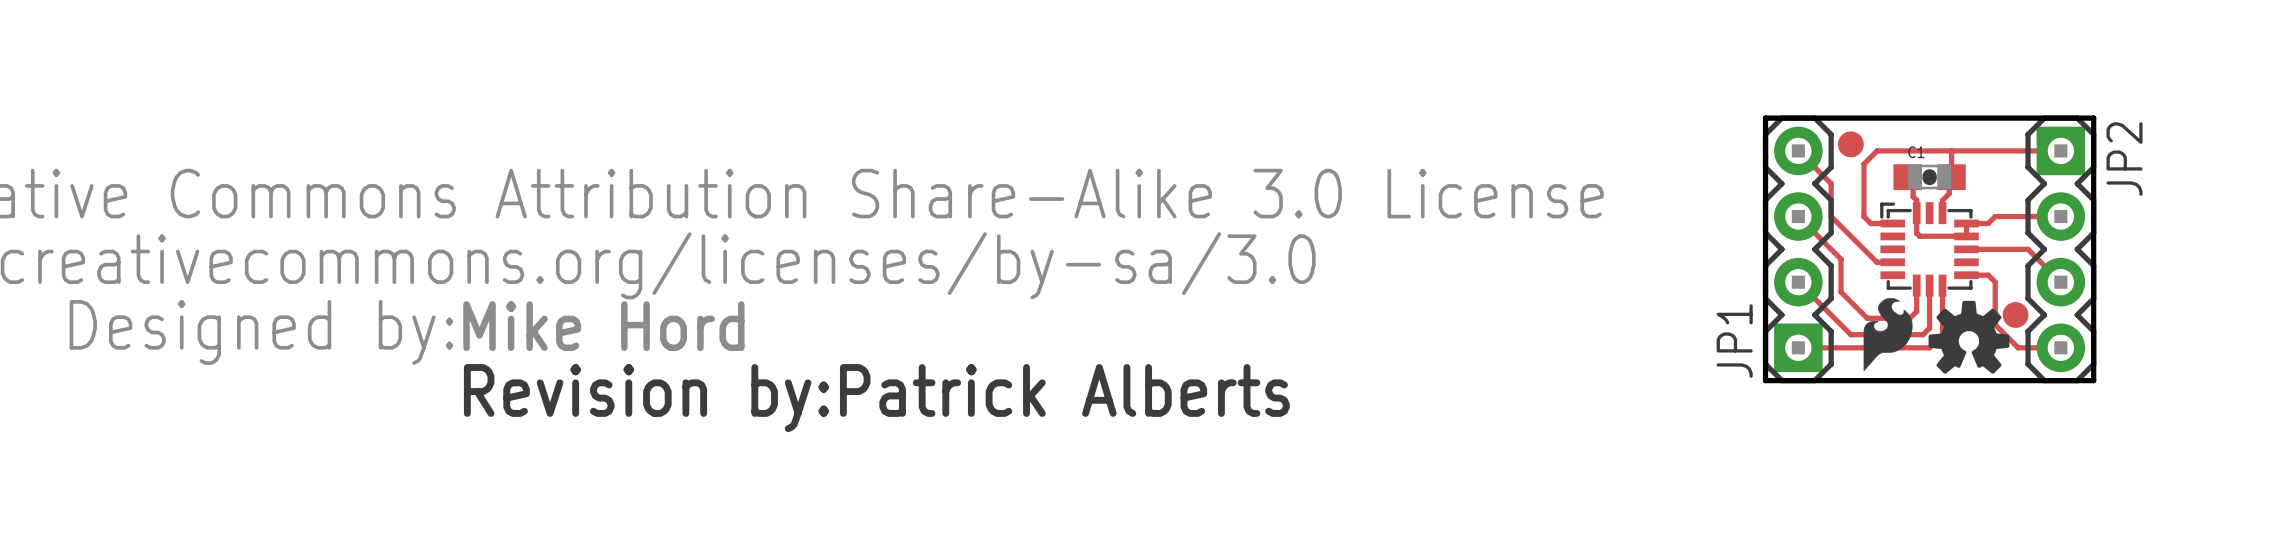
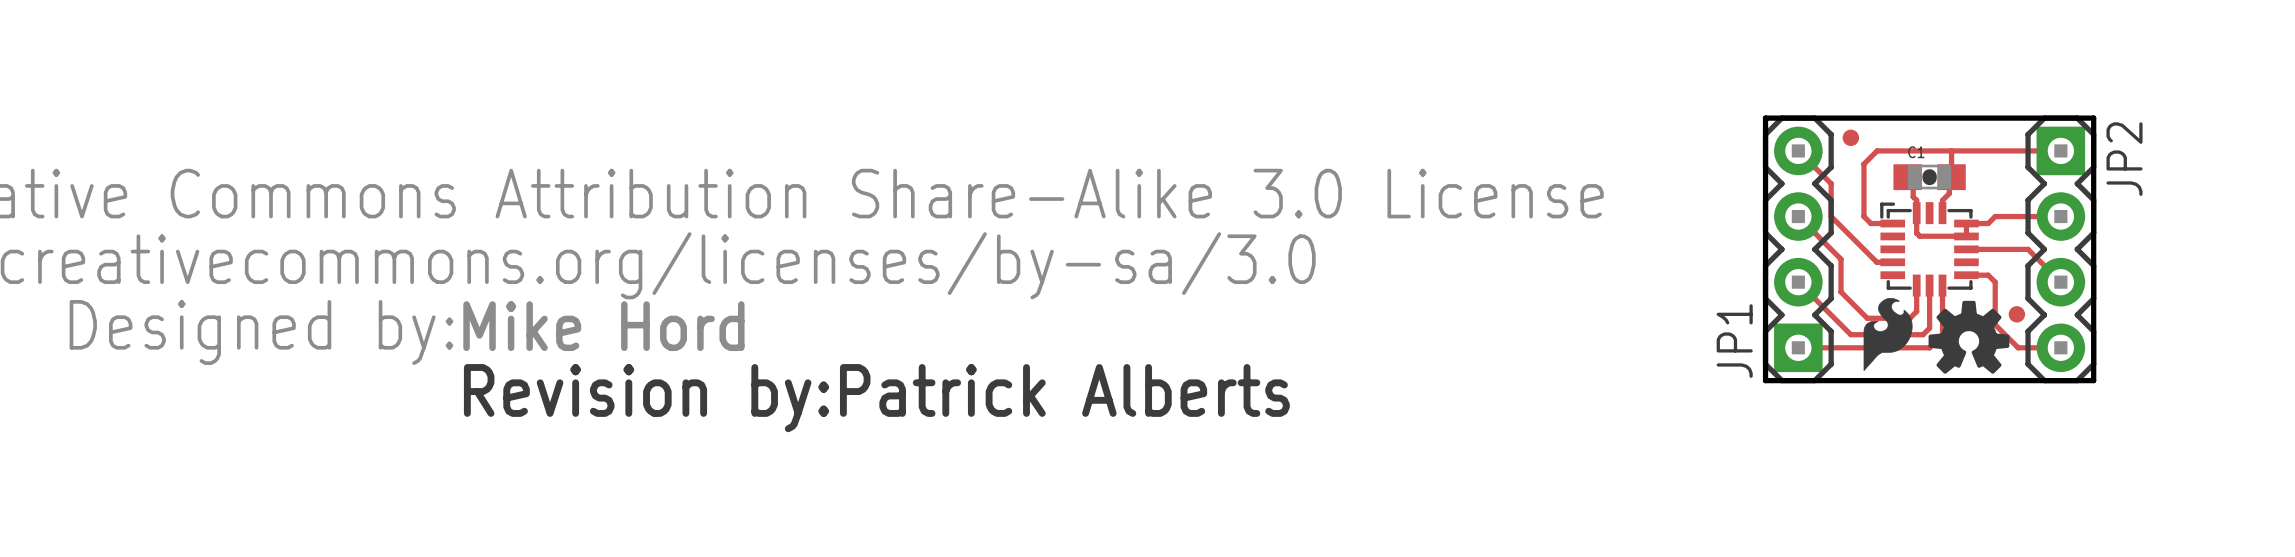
part footprint: [1837, 131, 1864, 158] -> [1842, 129, 1860, 147]
part footprint: [2002, 302, 2029, 328] -> [2008, 306, 2026, 323]

